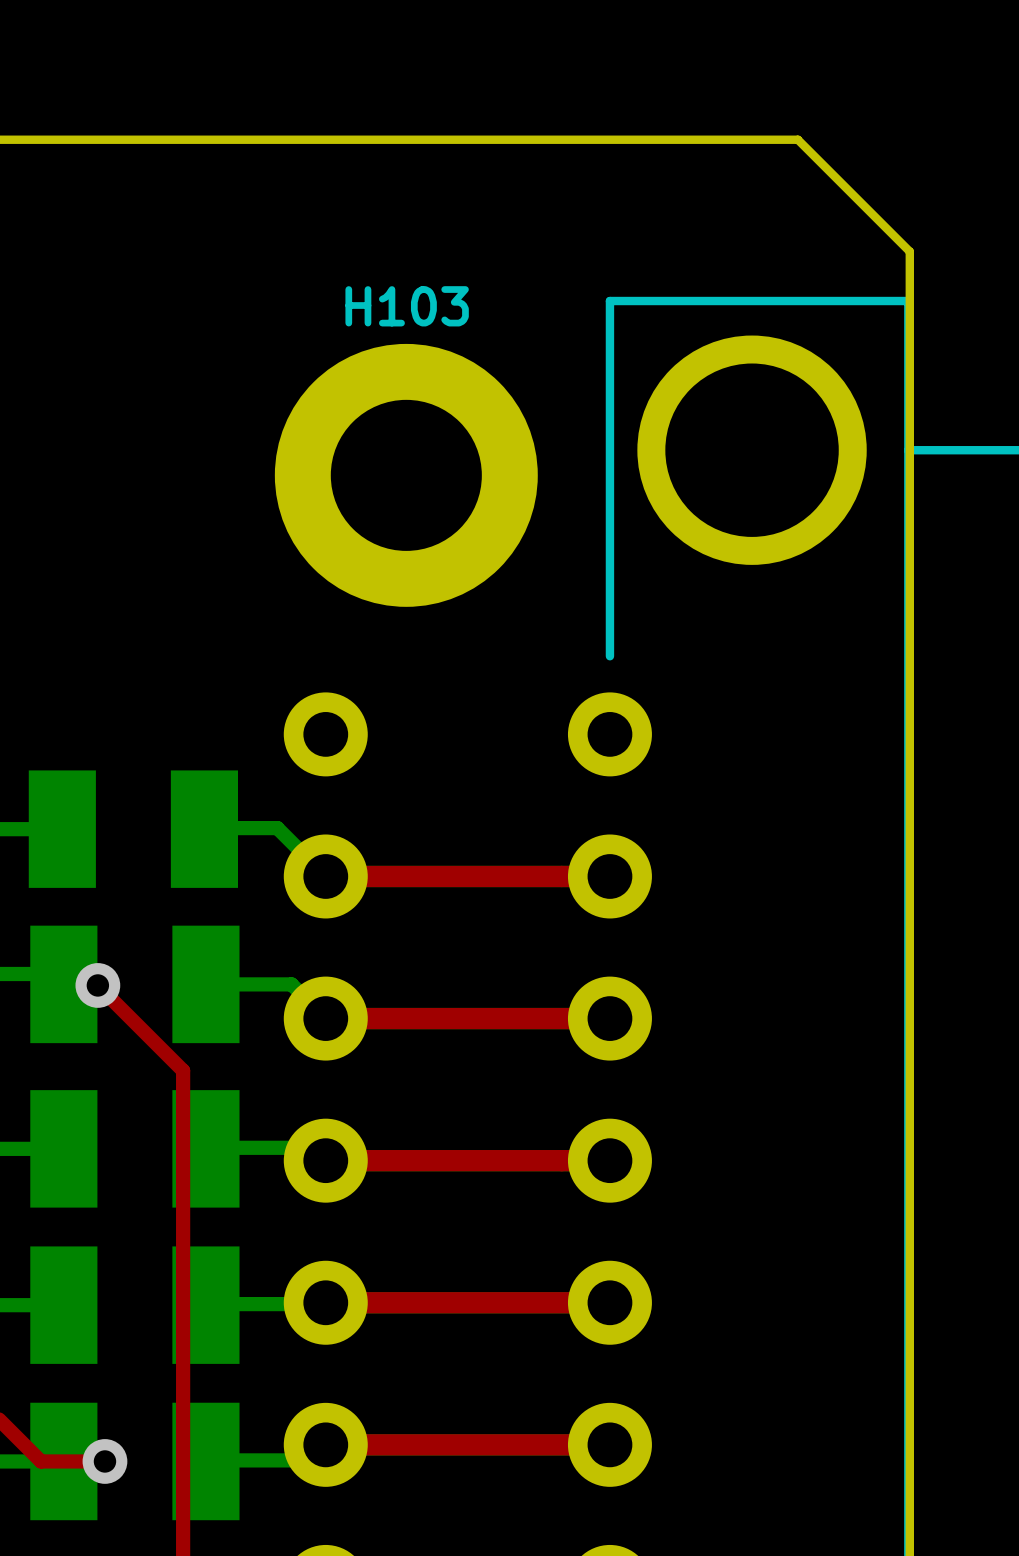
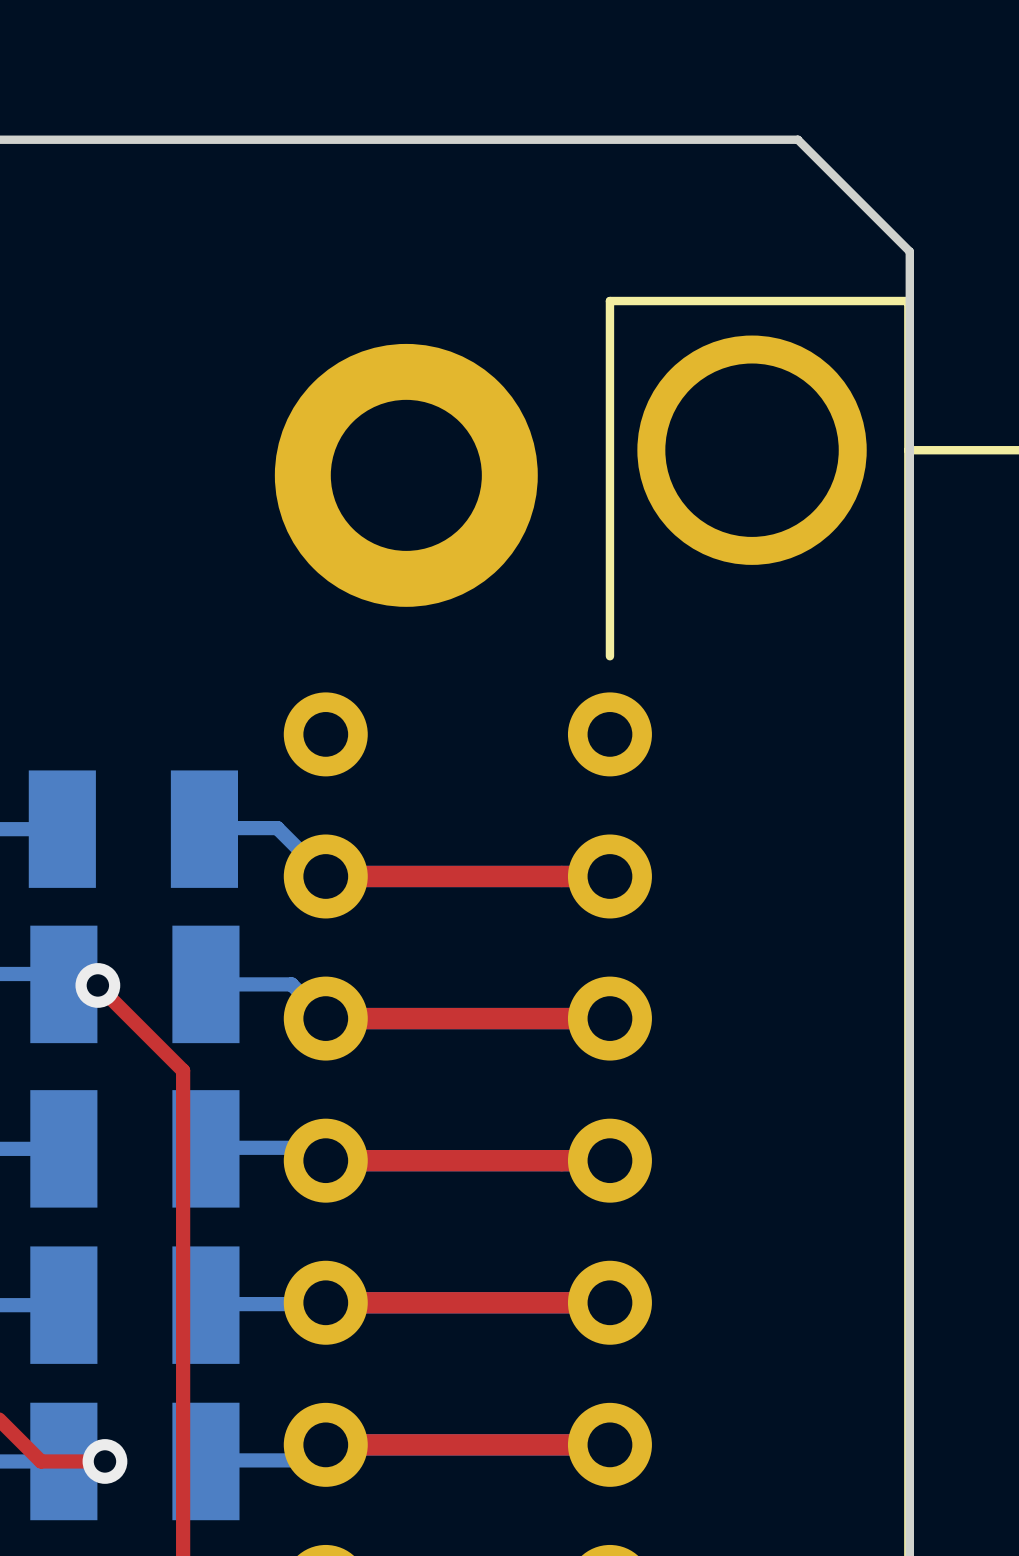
H103 name: H103 (407, 306) -> none

